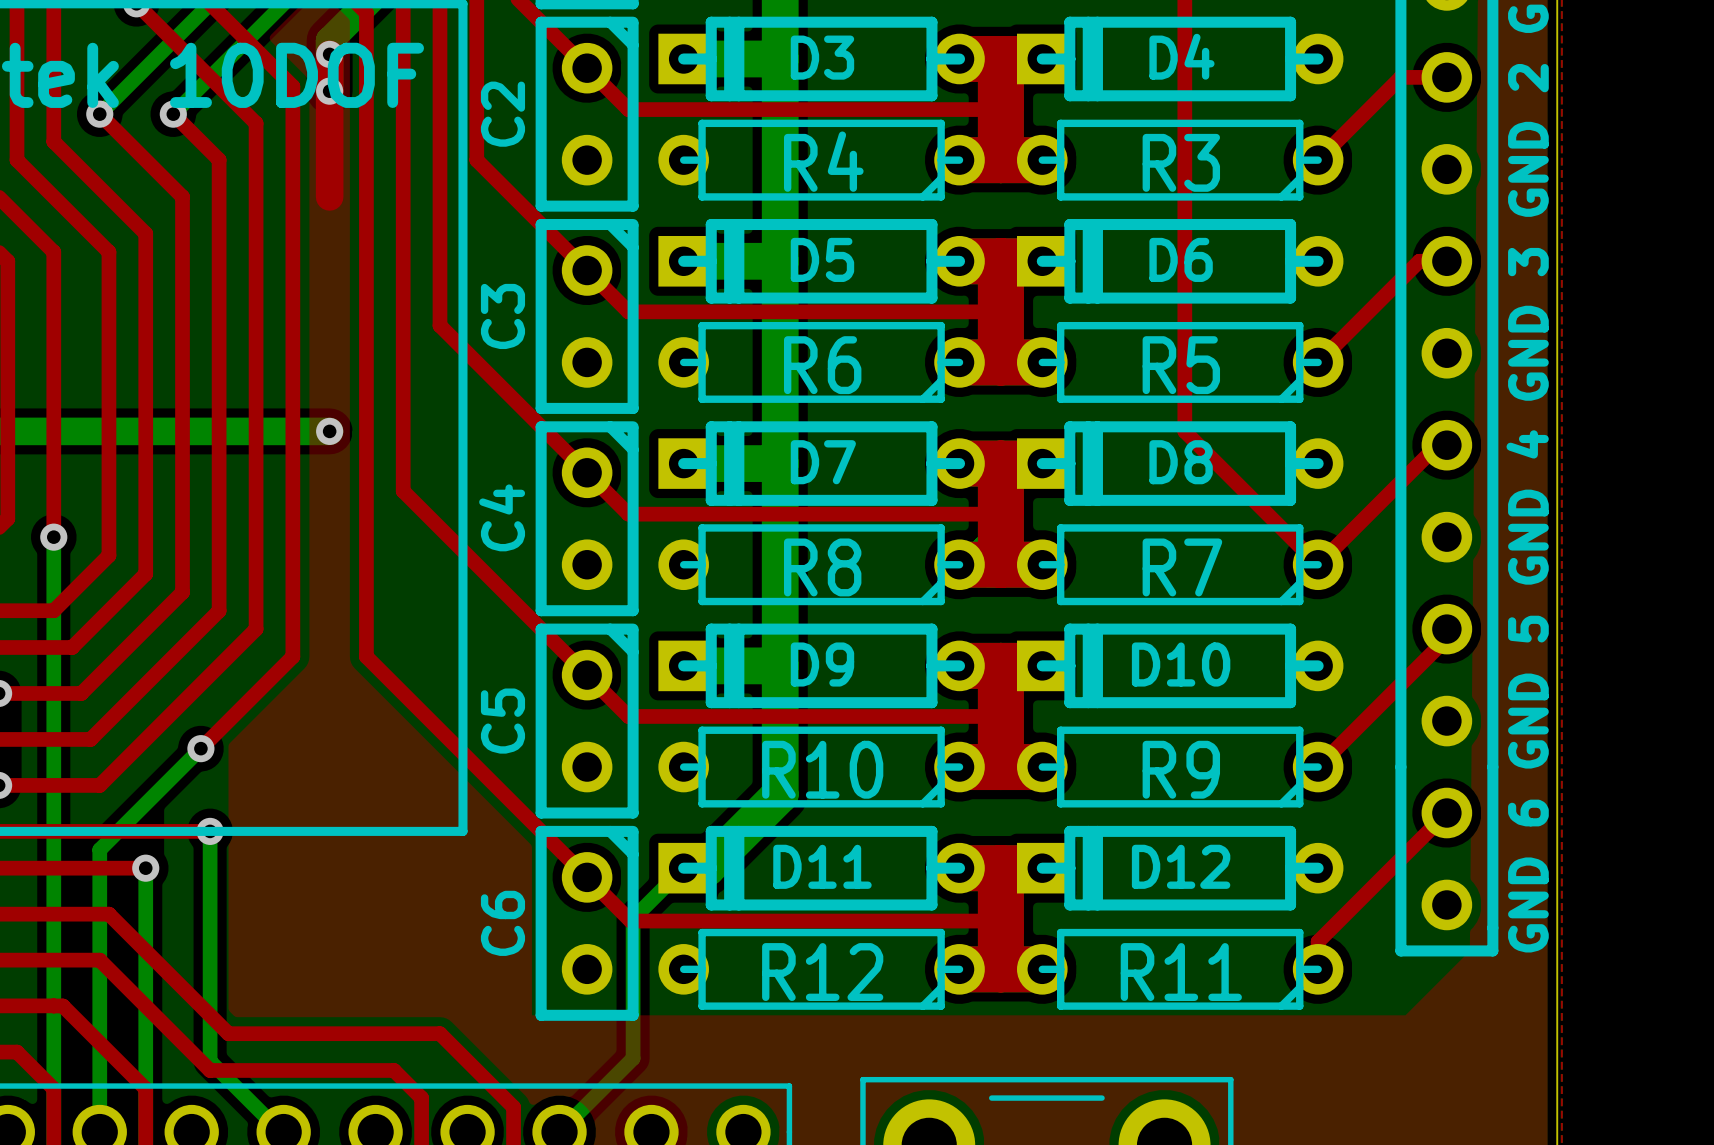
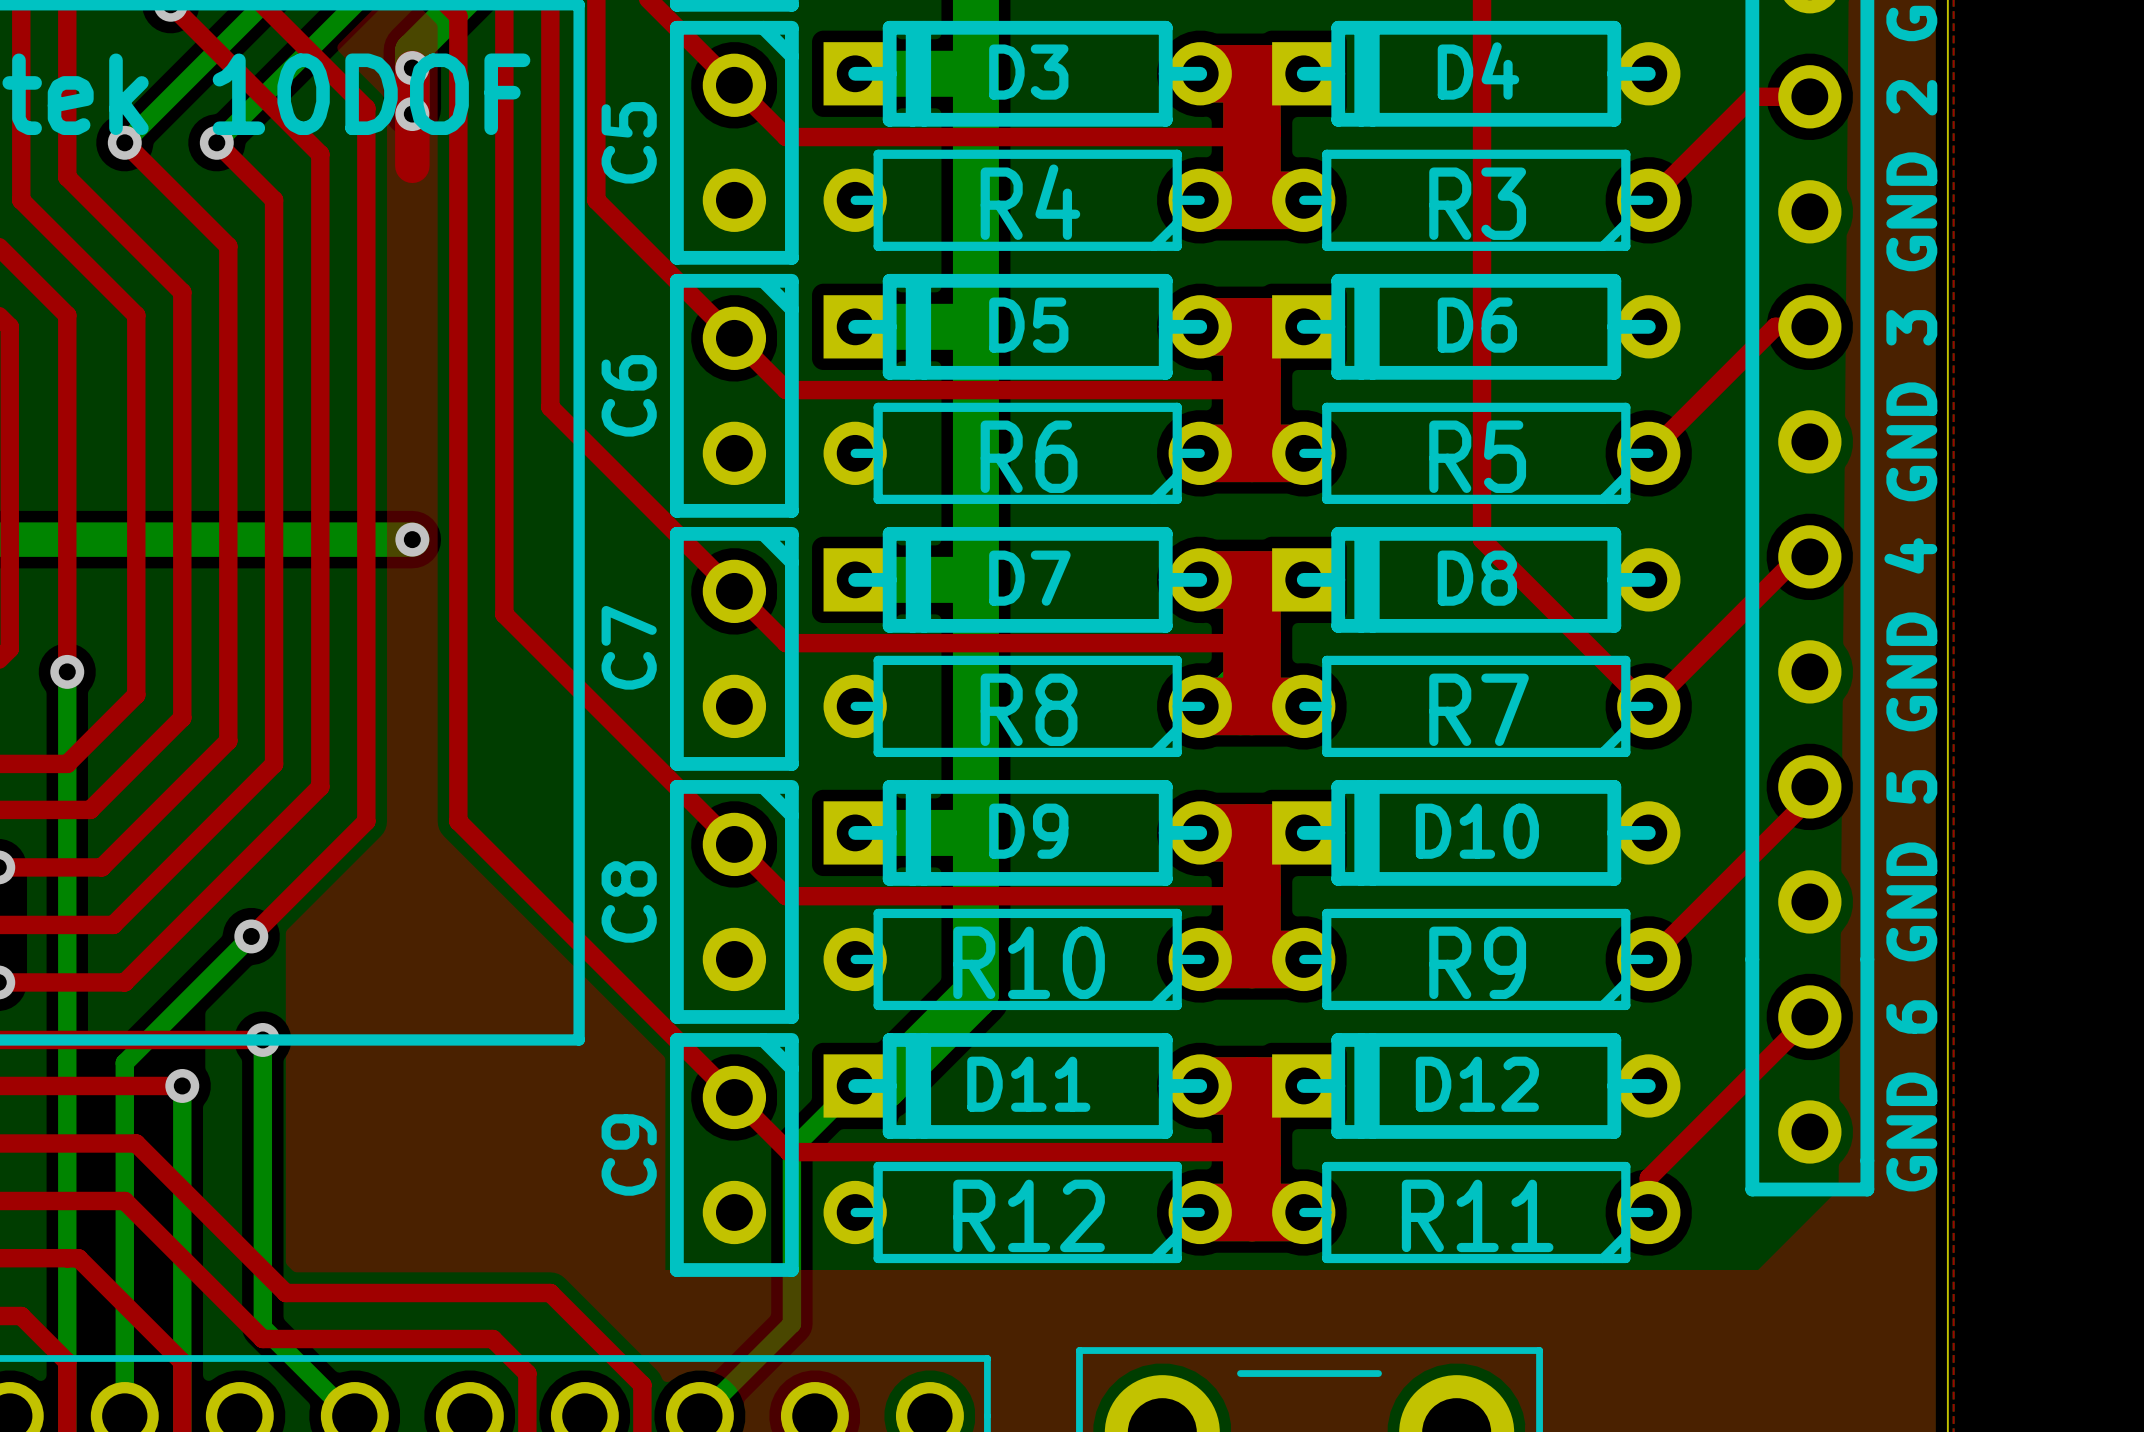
C2 name: C2 (502, 114) -> C5 (629, 142)
top track: (329, 132) (329, 196) -> none
C3 name: C3 (502, 316) -> C6 (629, 395)
C4 name: C4 (502, 517) -> C7 (629, 647)
C5 name: C5 (502, 721) -> C8 (629, 901)
C6 name: C6 (502, 923) -> C9 (629, 1154)

